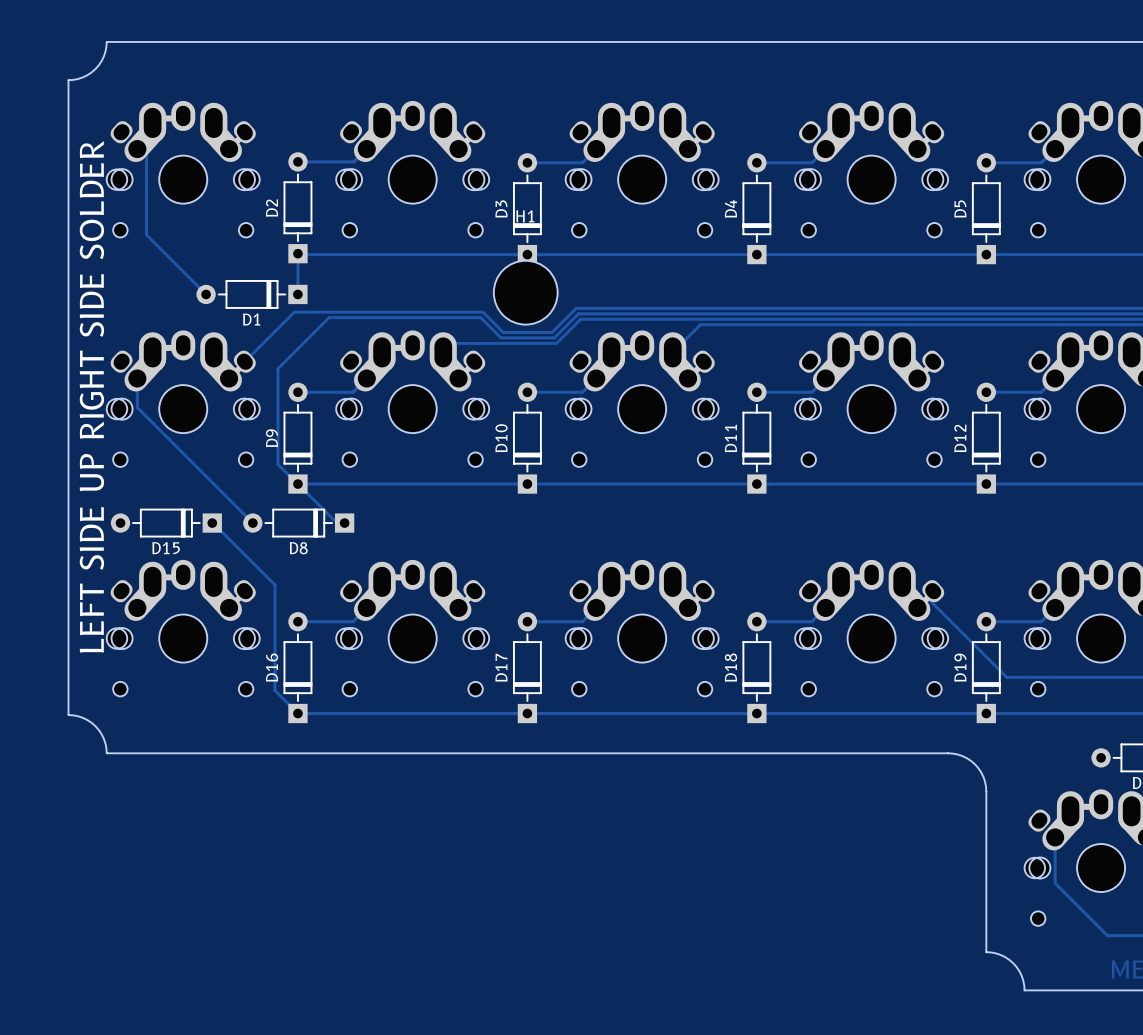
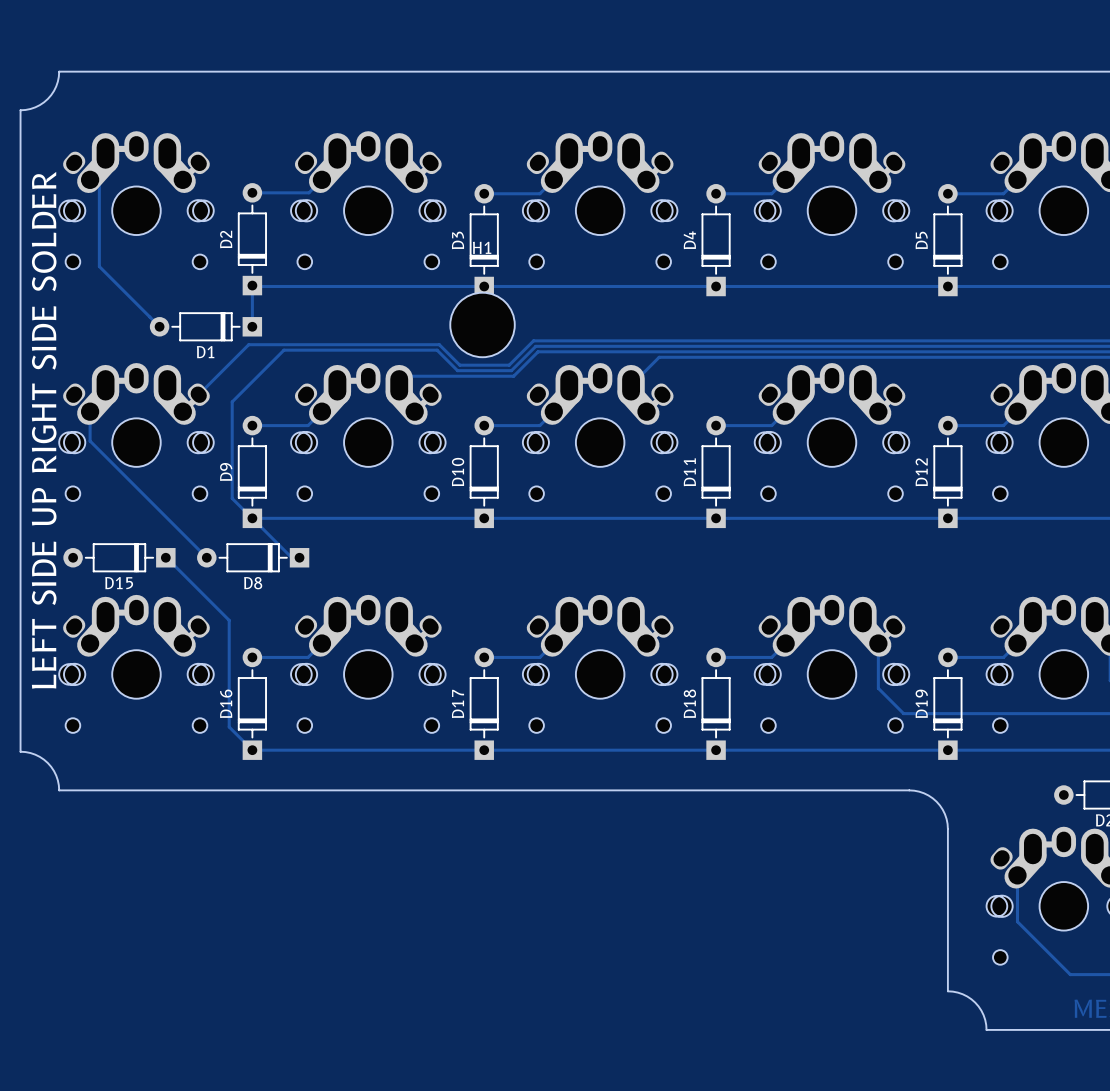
track: (917, 607) (925, 600) (929, 600) (1006, 677) -> (878, 643) (878, 688) (903, 713) (968, 713)

